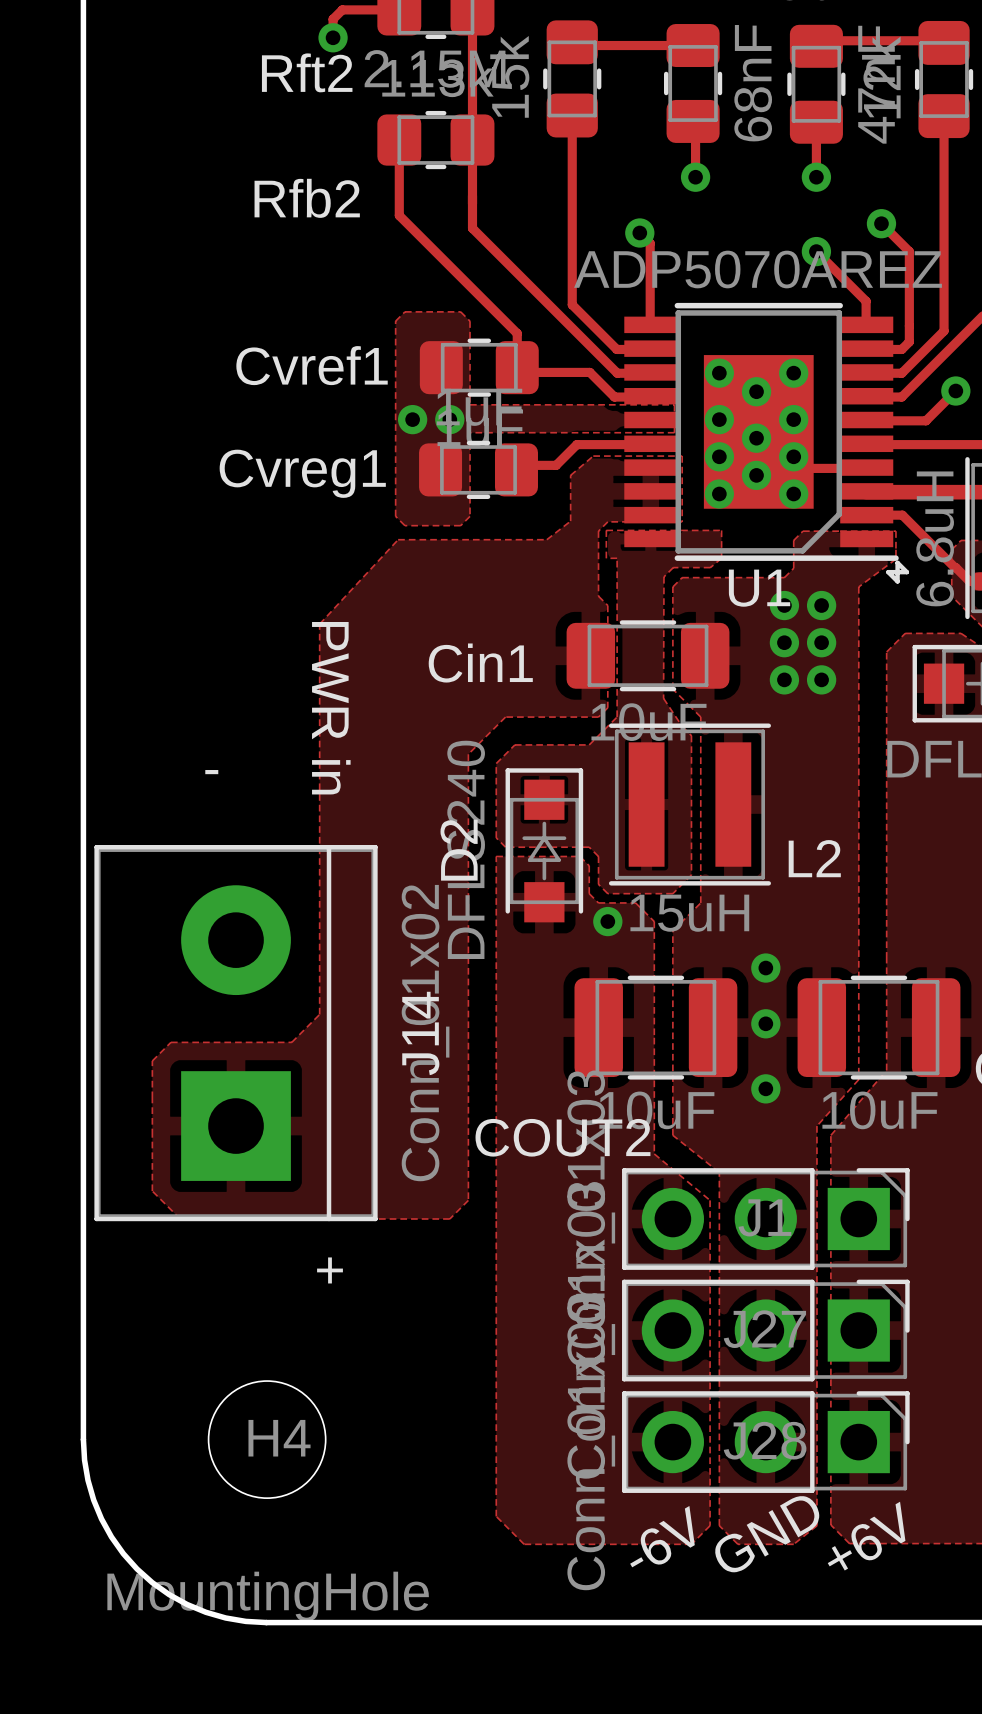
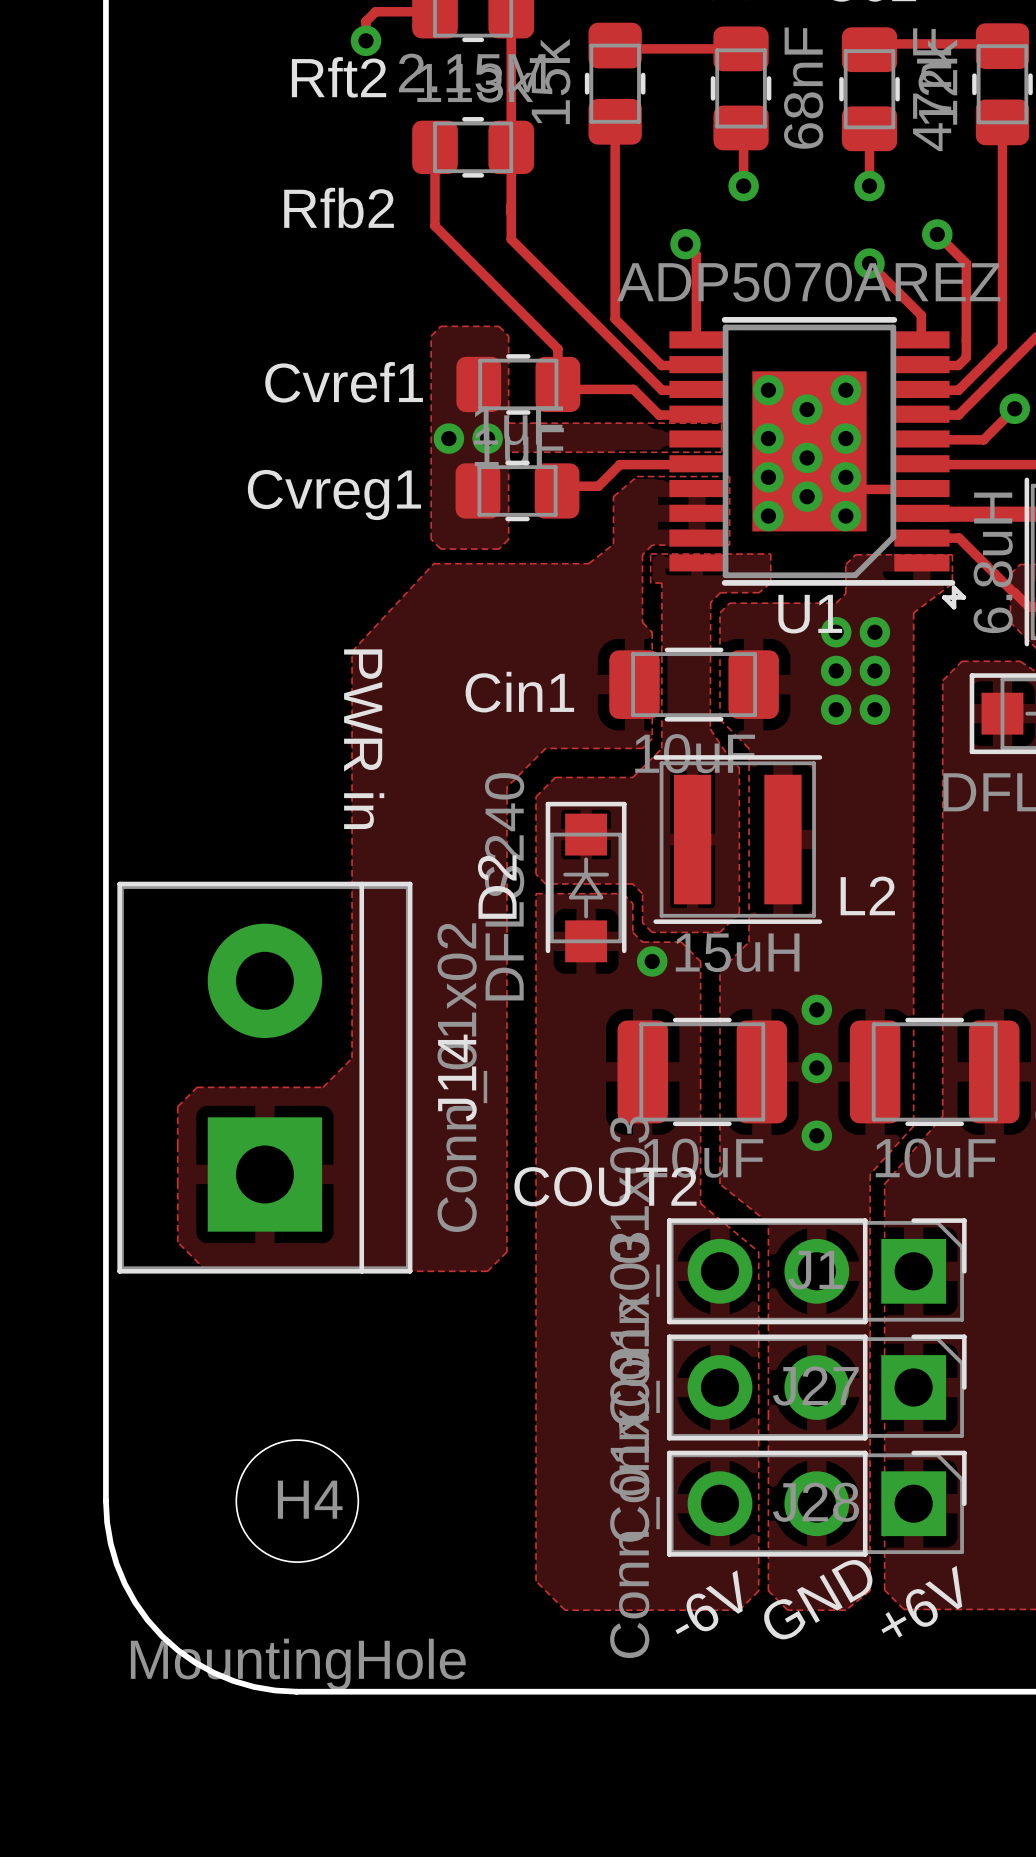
text: - (211, 772) -> none
text: + (330, 1270) -> none

